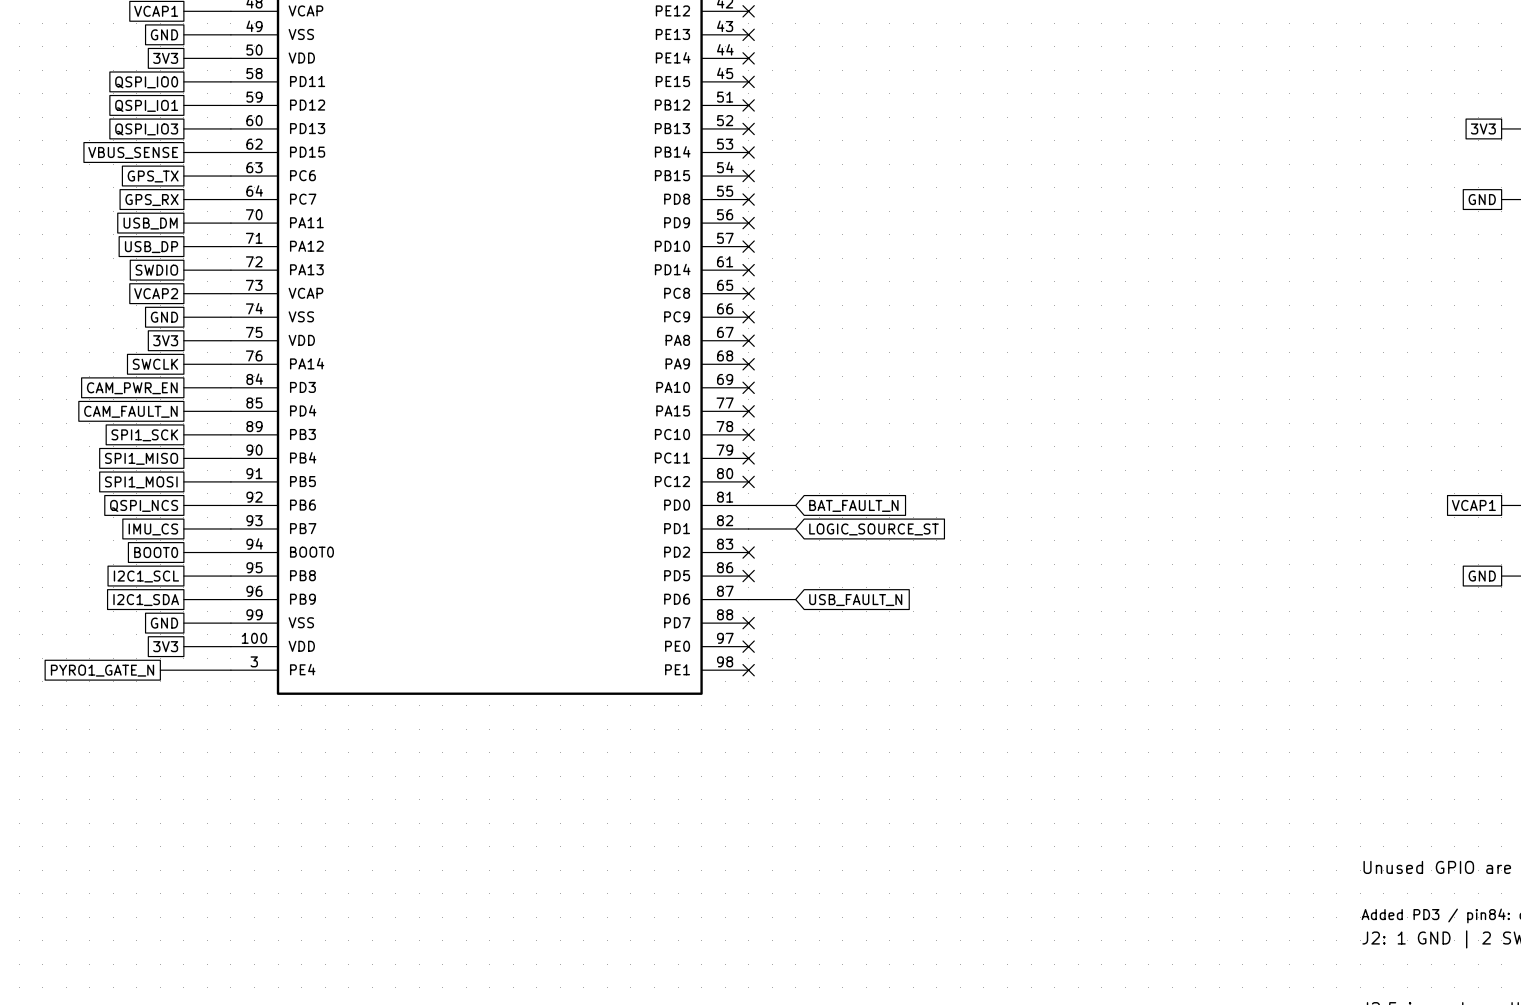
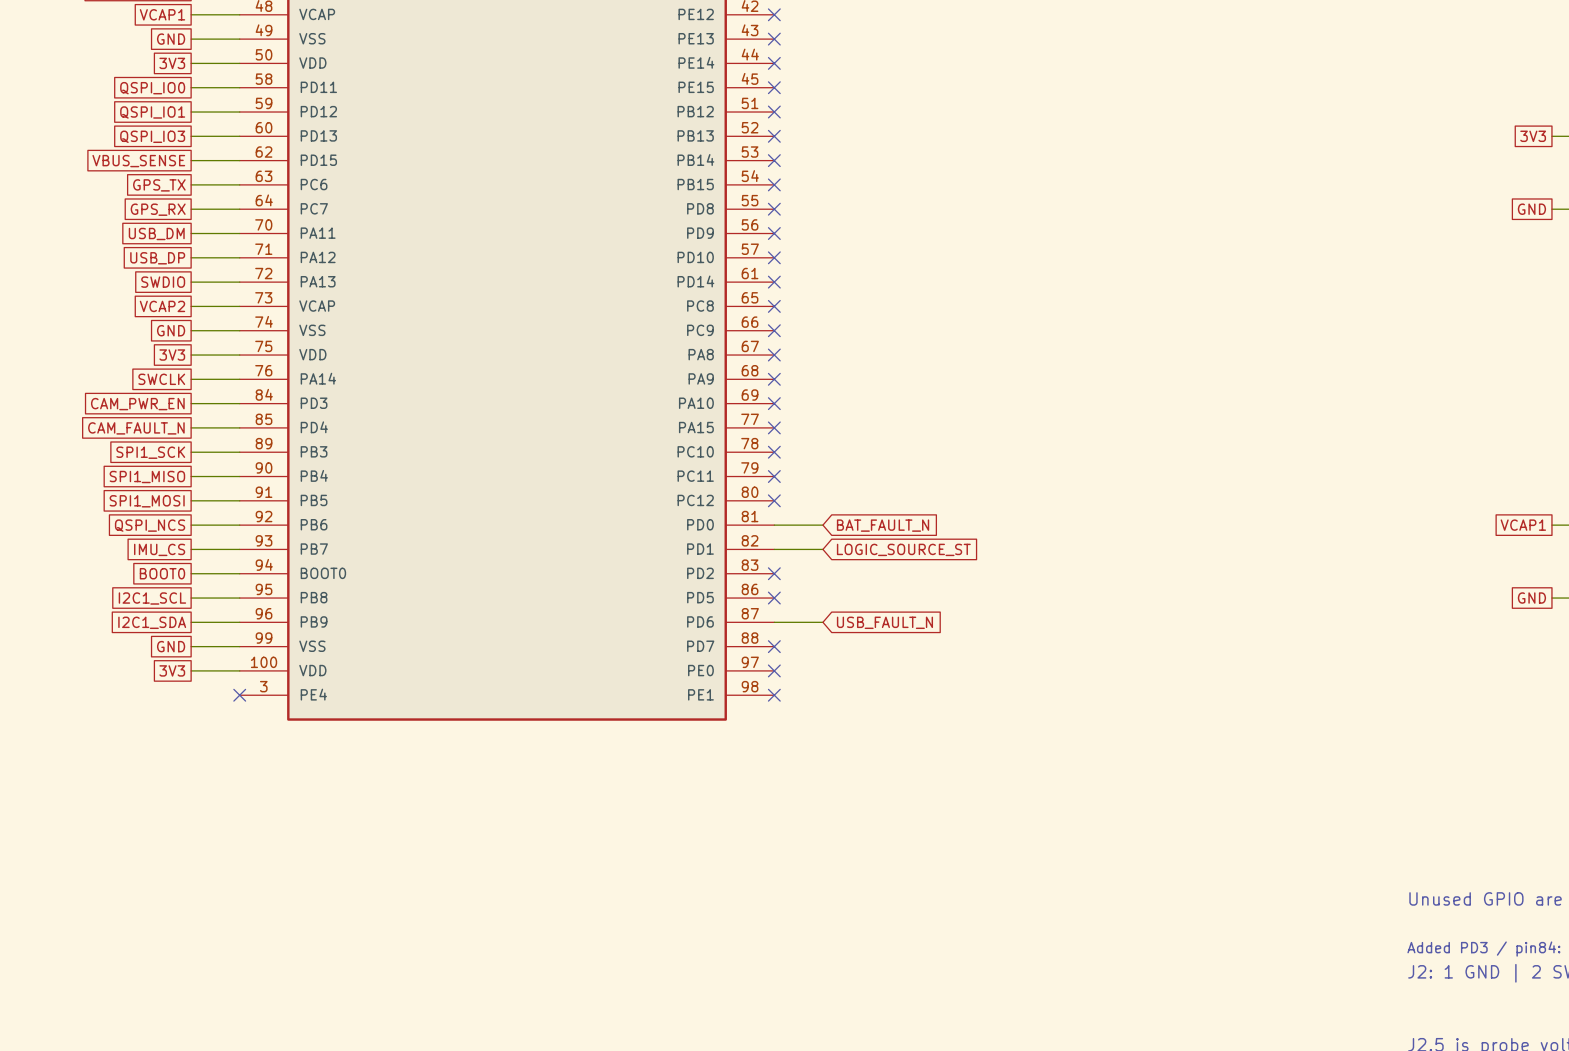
global label: PYRO1_GATE_N (102, 670) -> none
wire: (160, 670) (230, 670) -> none
no-connect mark: none -> (239, 695)

